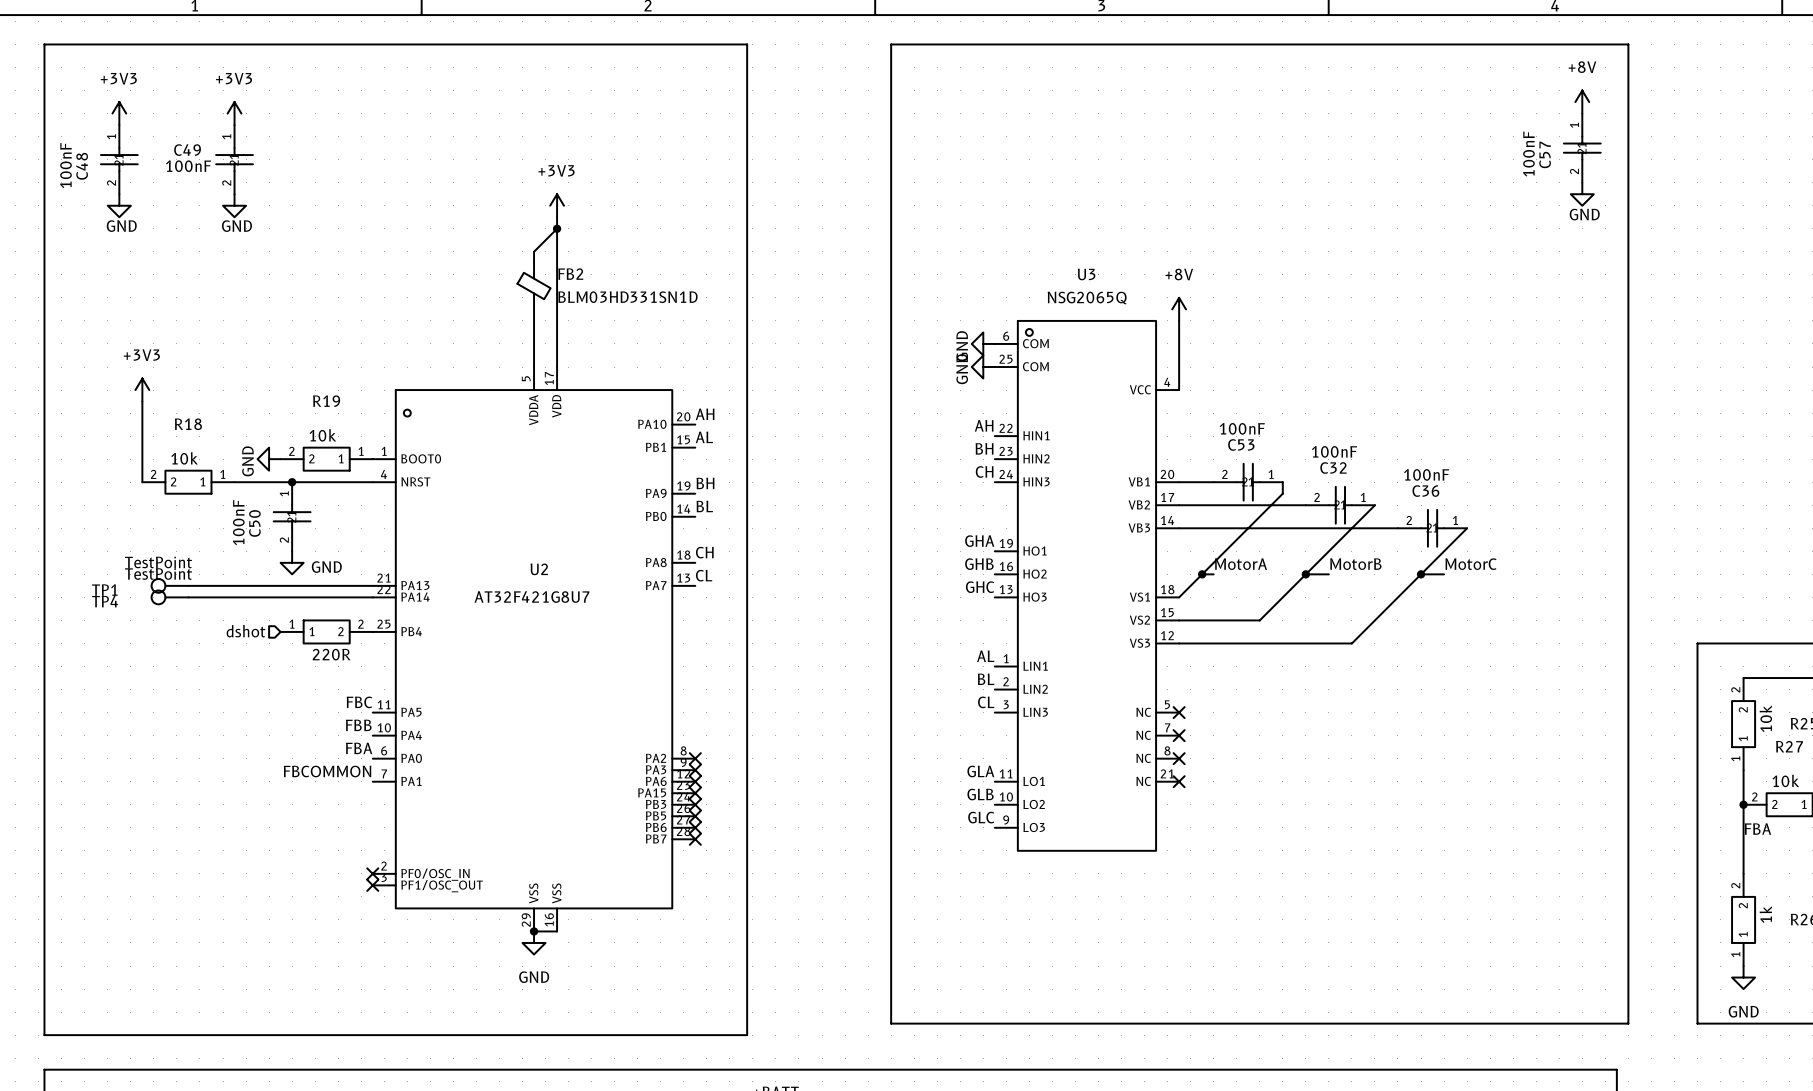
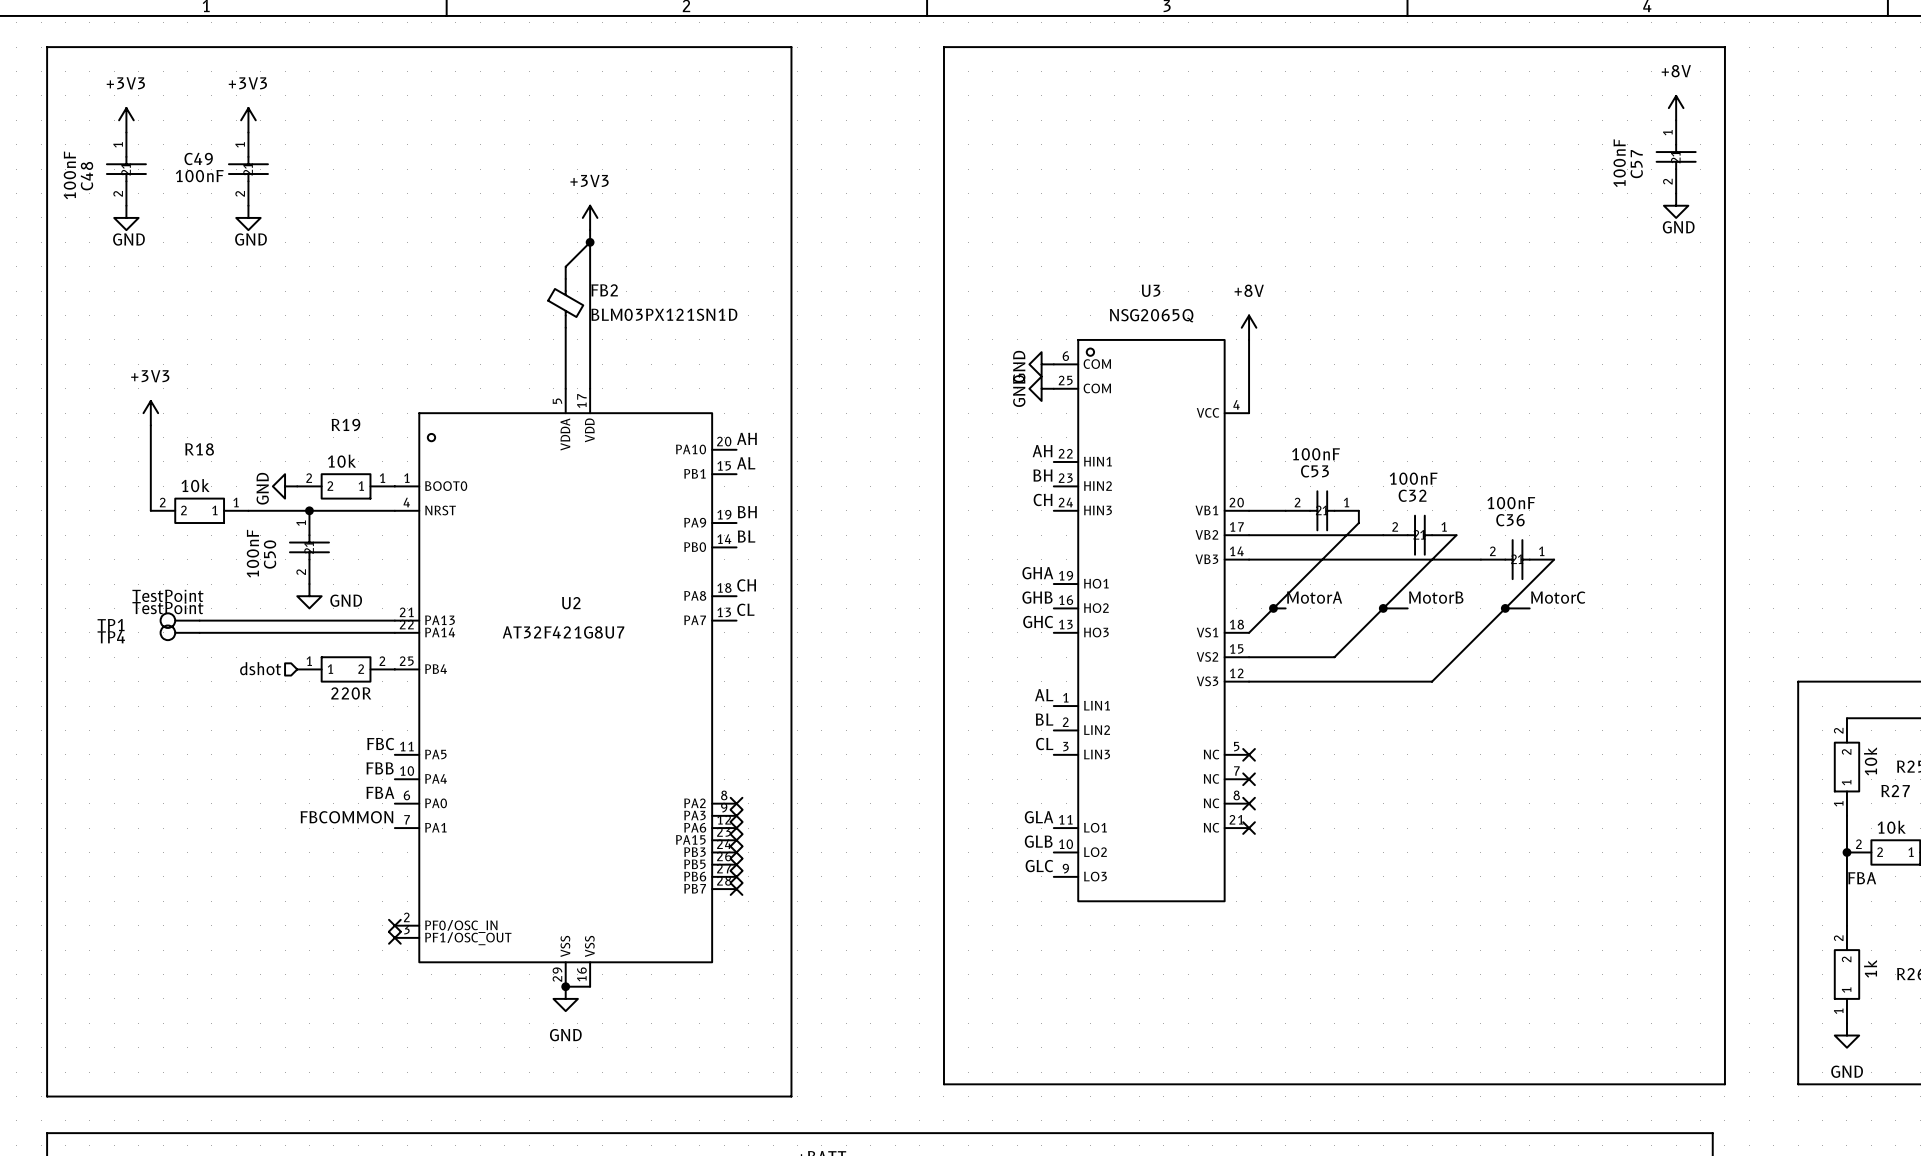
FB2 value: BLM03HD331SN1D (627, 297) -> BLM03PX121SN1D (664, 314)

